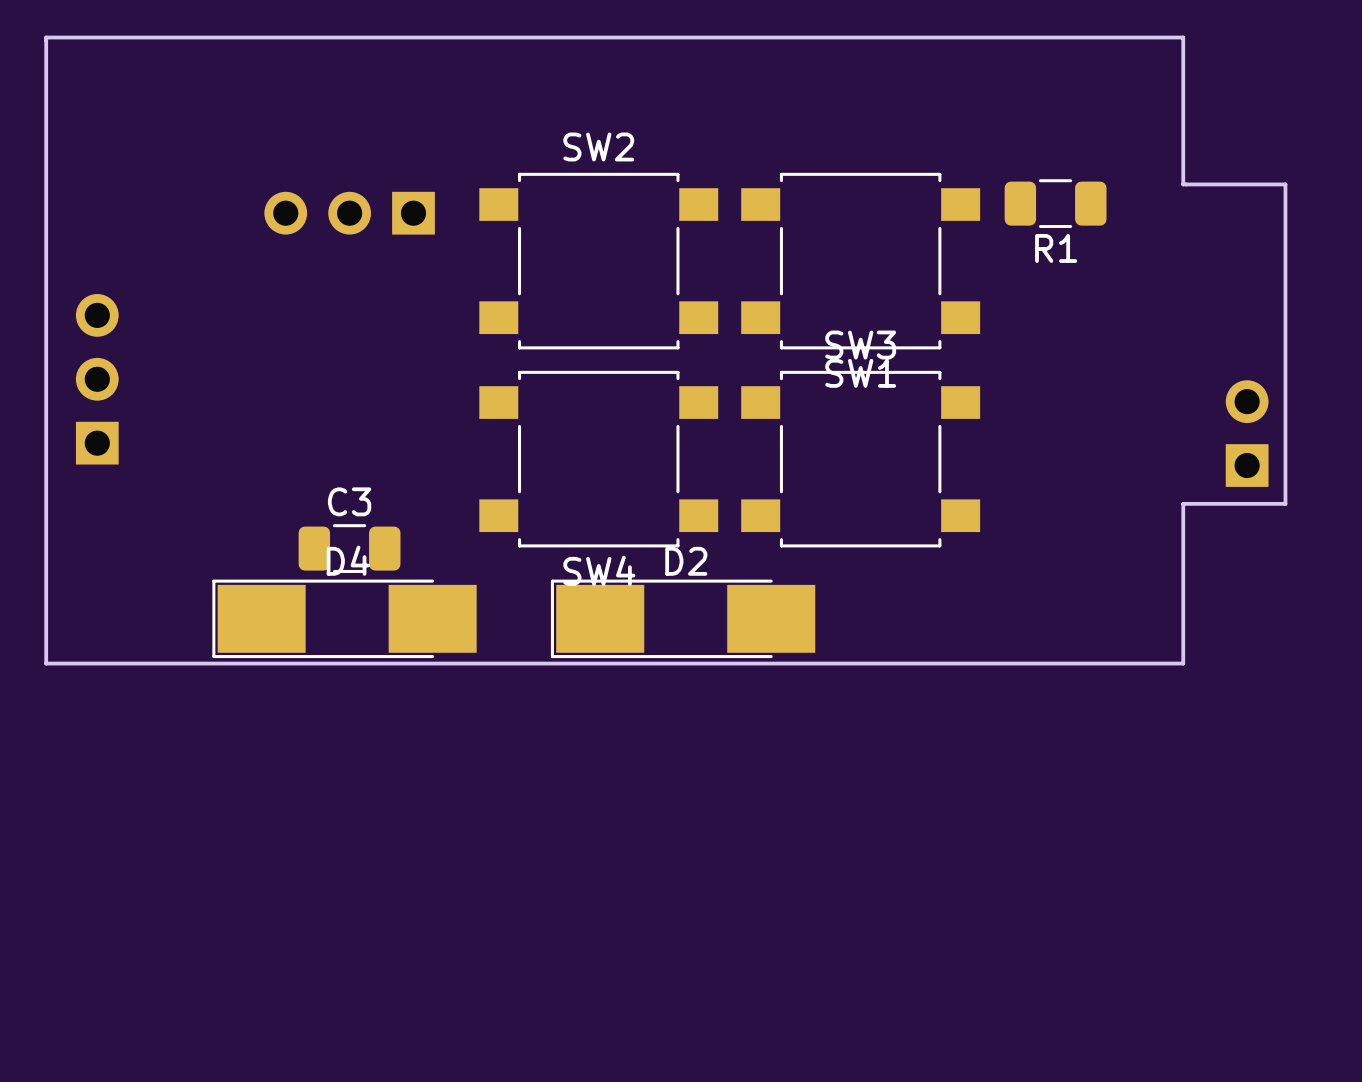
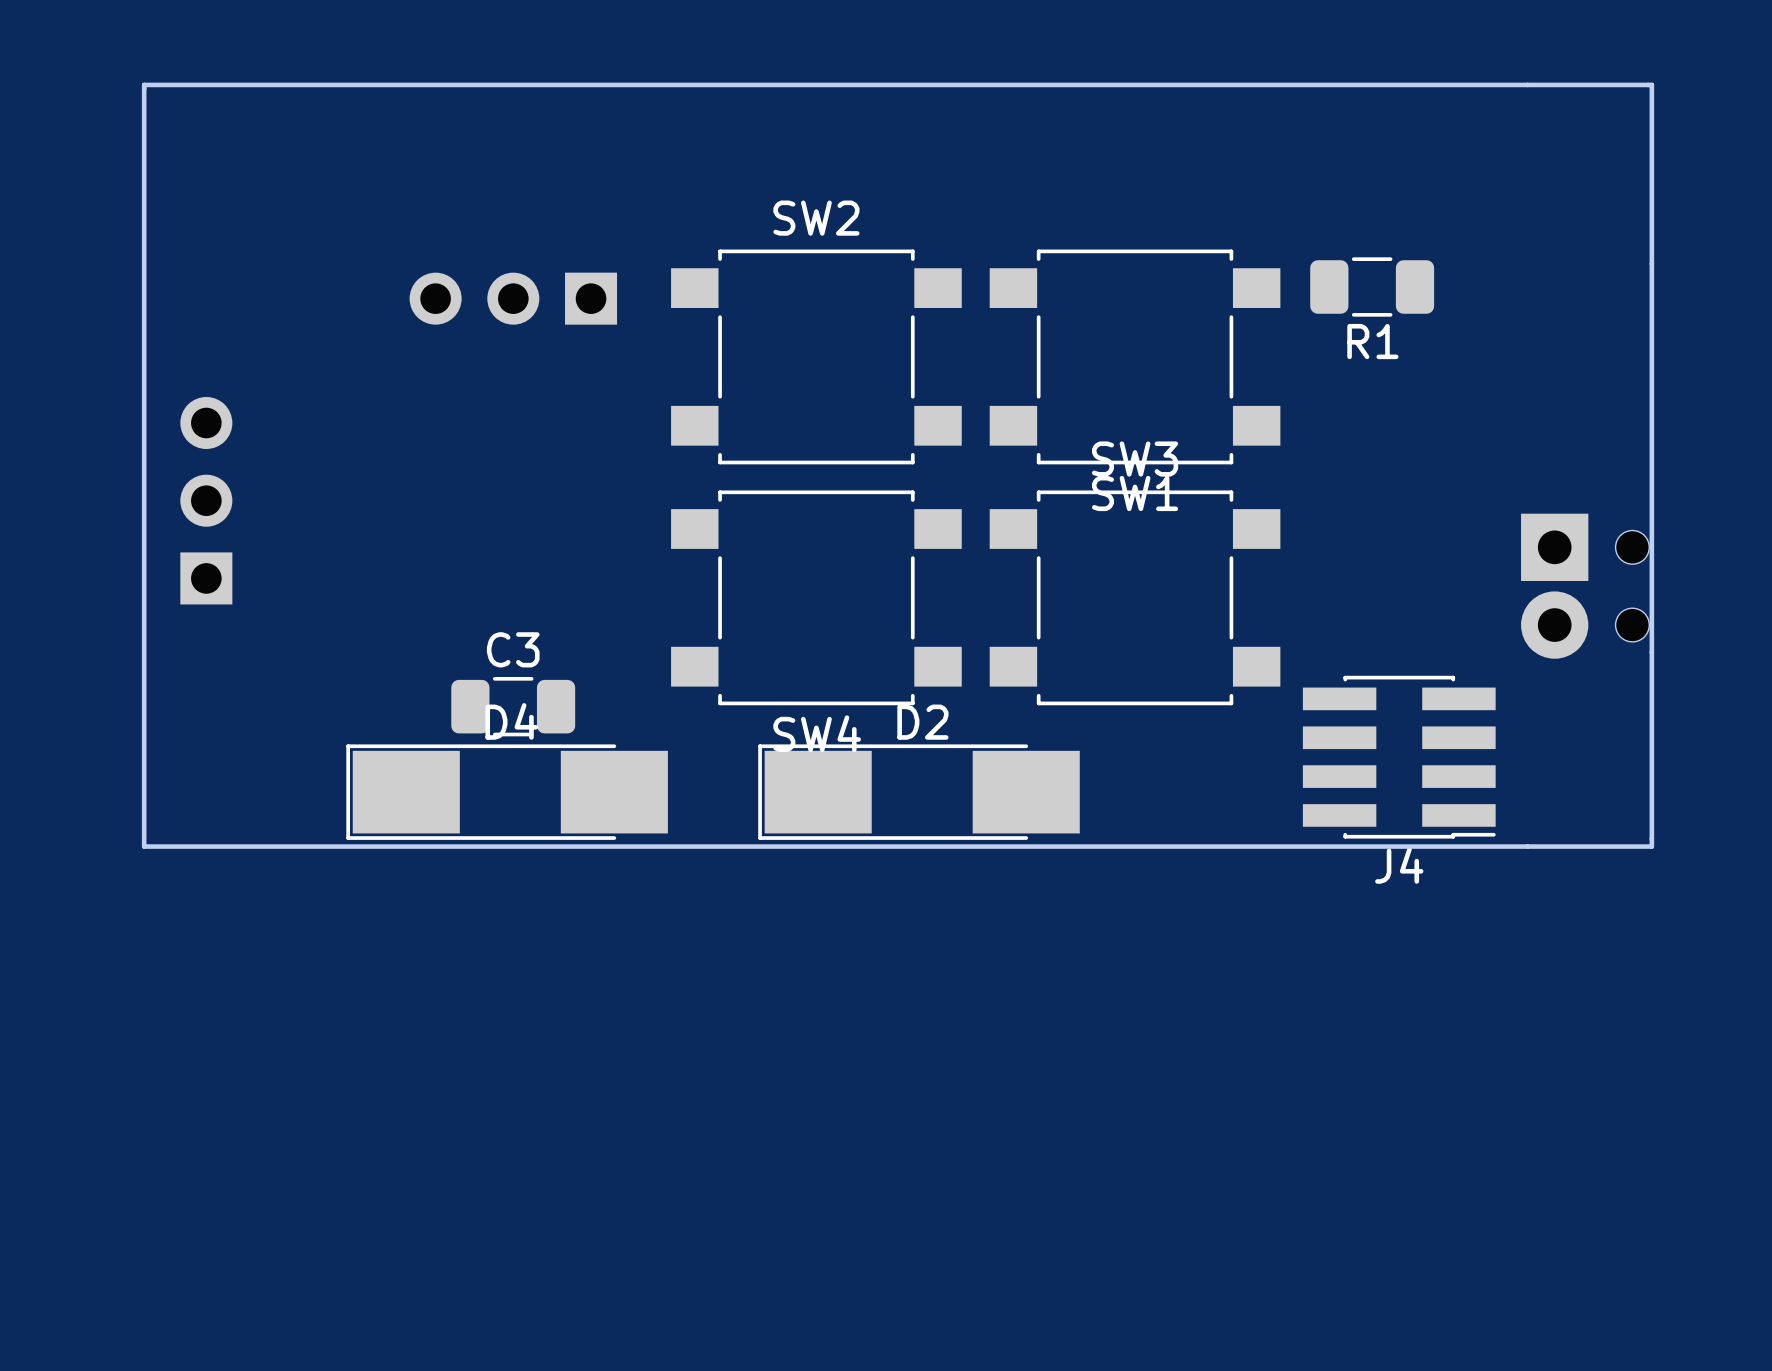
board edge: (1183, 37) (1183, 184) (1285, 184) -> (1527, 84) (1651, 84) (1651, 263)
part footprint: [1225, 380, 1269, 487] -> [1521, 513, 1650, 659]
board edge: (1285, 503) (1183, 503) (1183, 663) -> (1651, 652) (1651, 846) (1527, 846)
J4: none -> (1399, 757)

